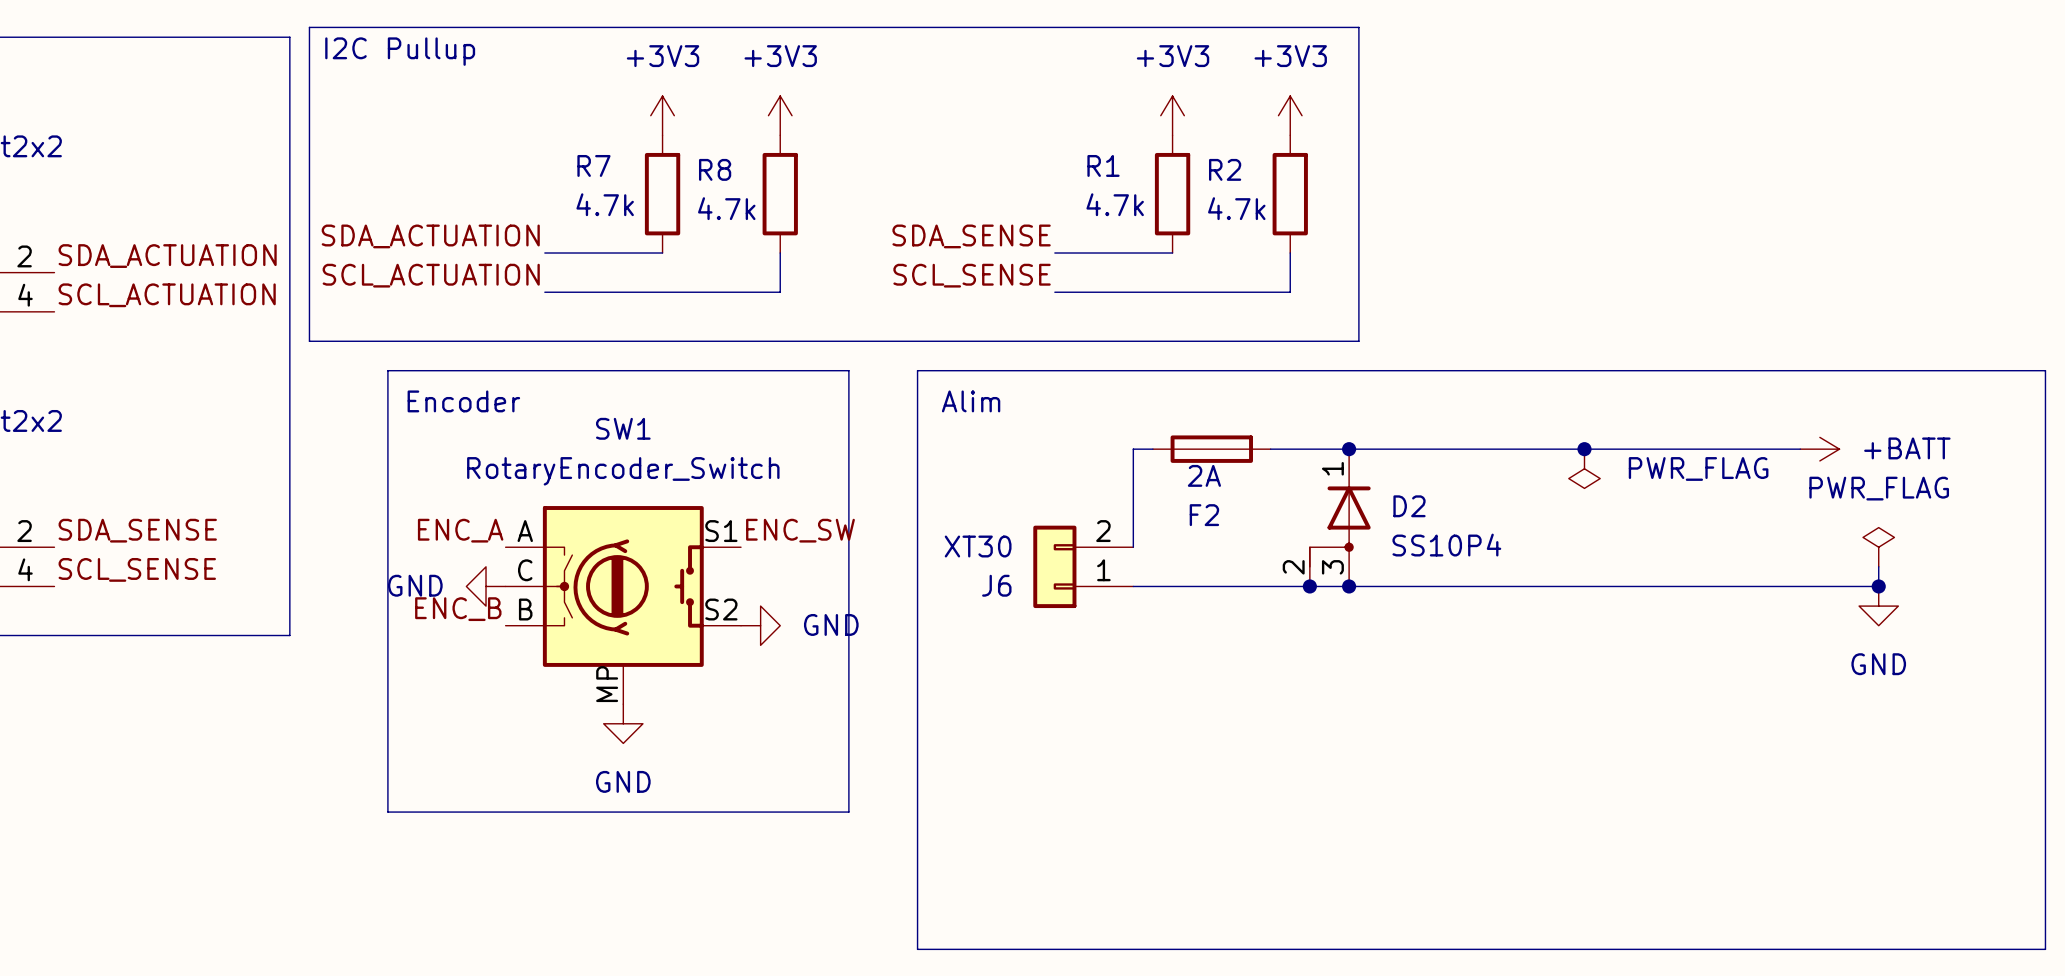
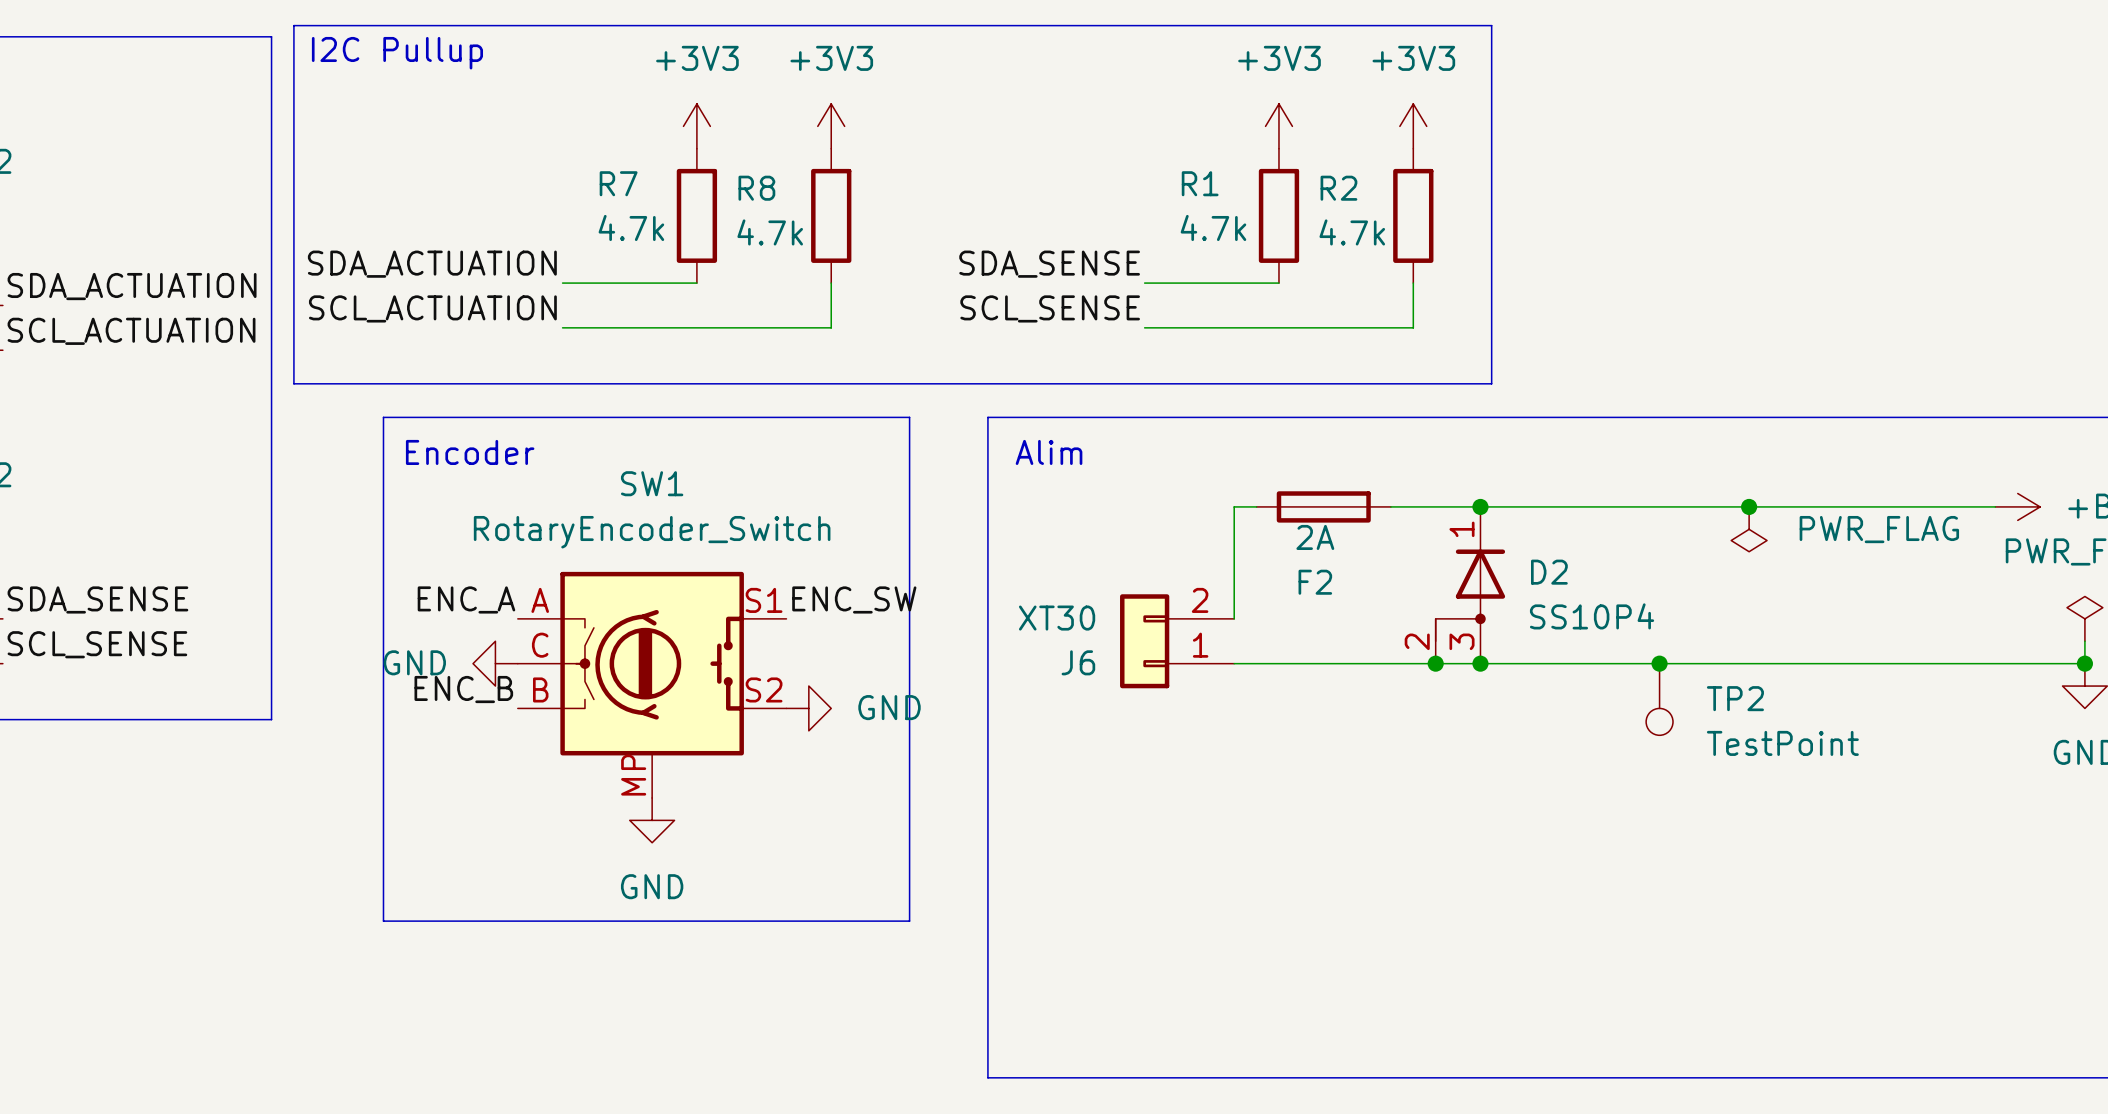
junction: none -> (1659, 663)
TP2: none -> TestPoint (1659, 699)

